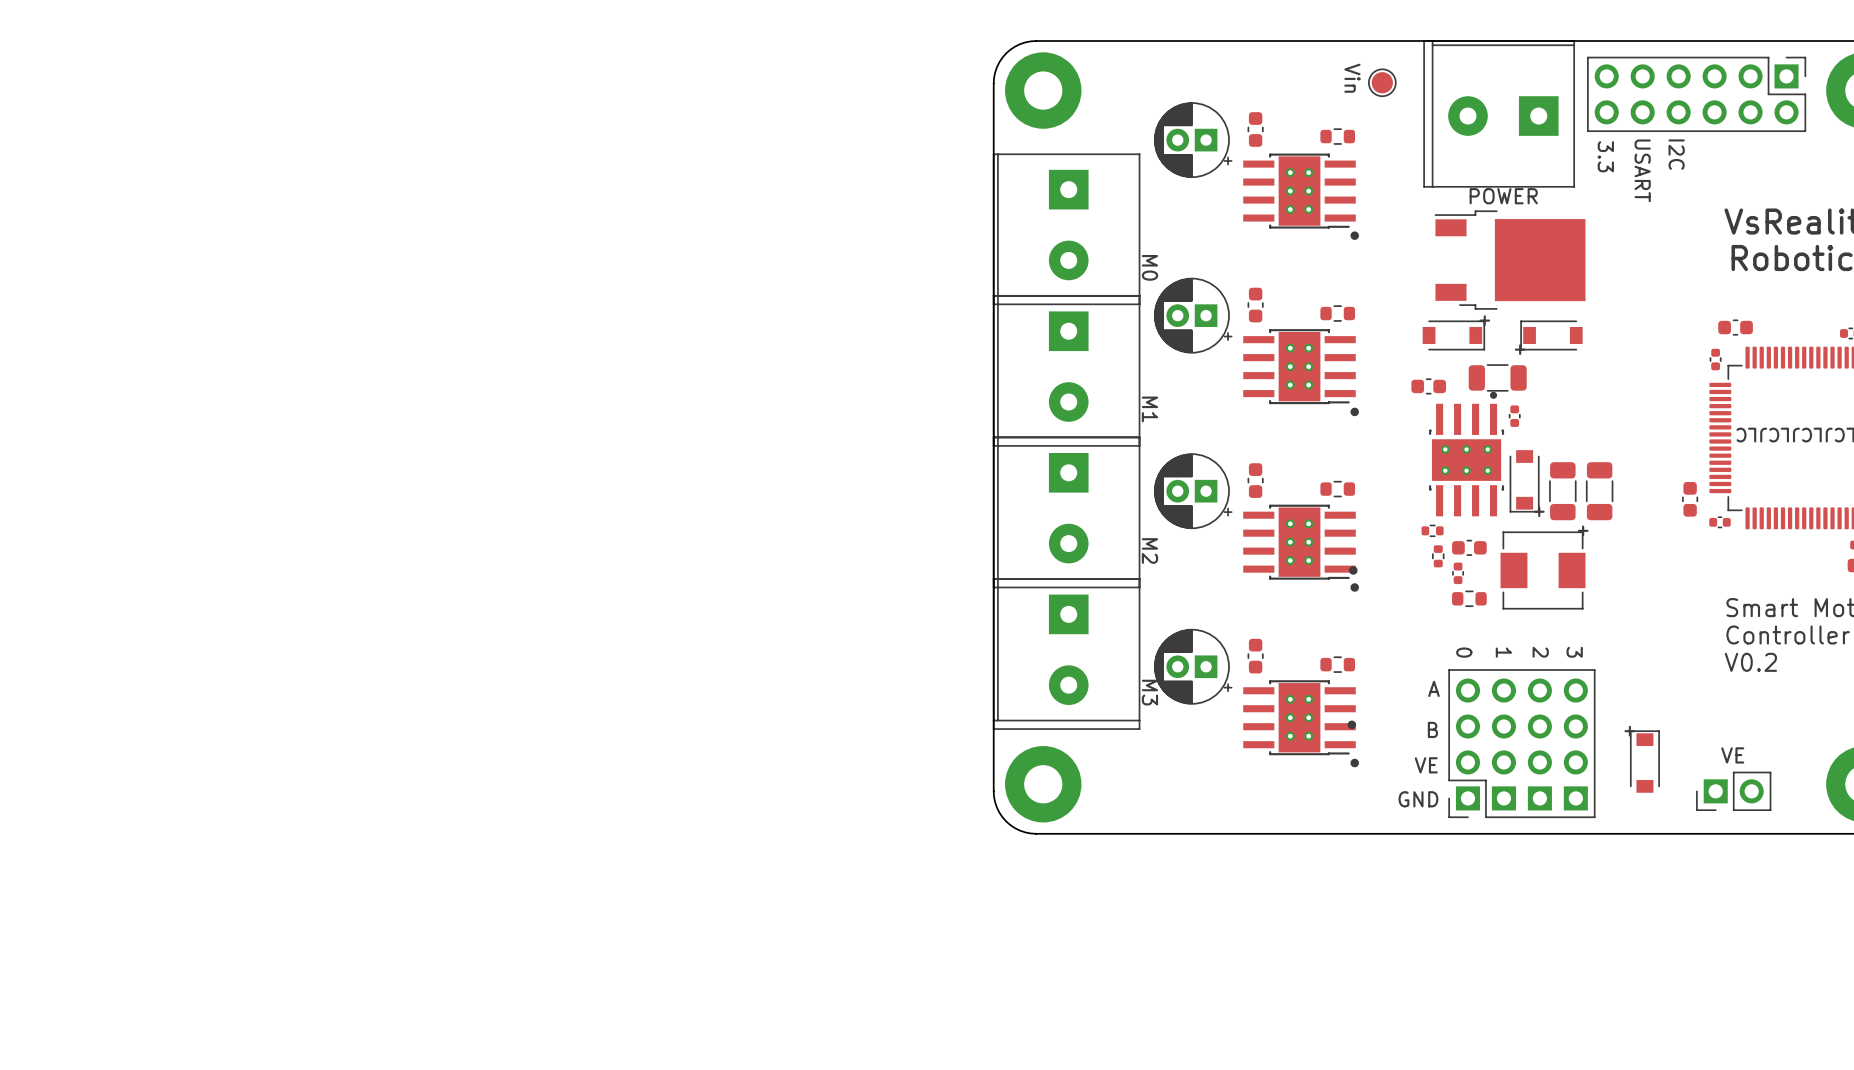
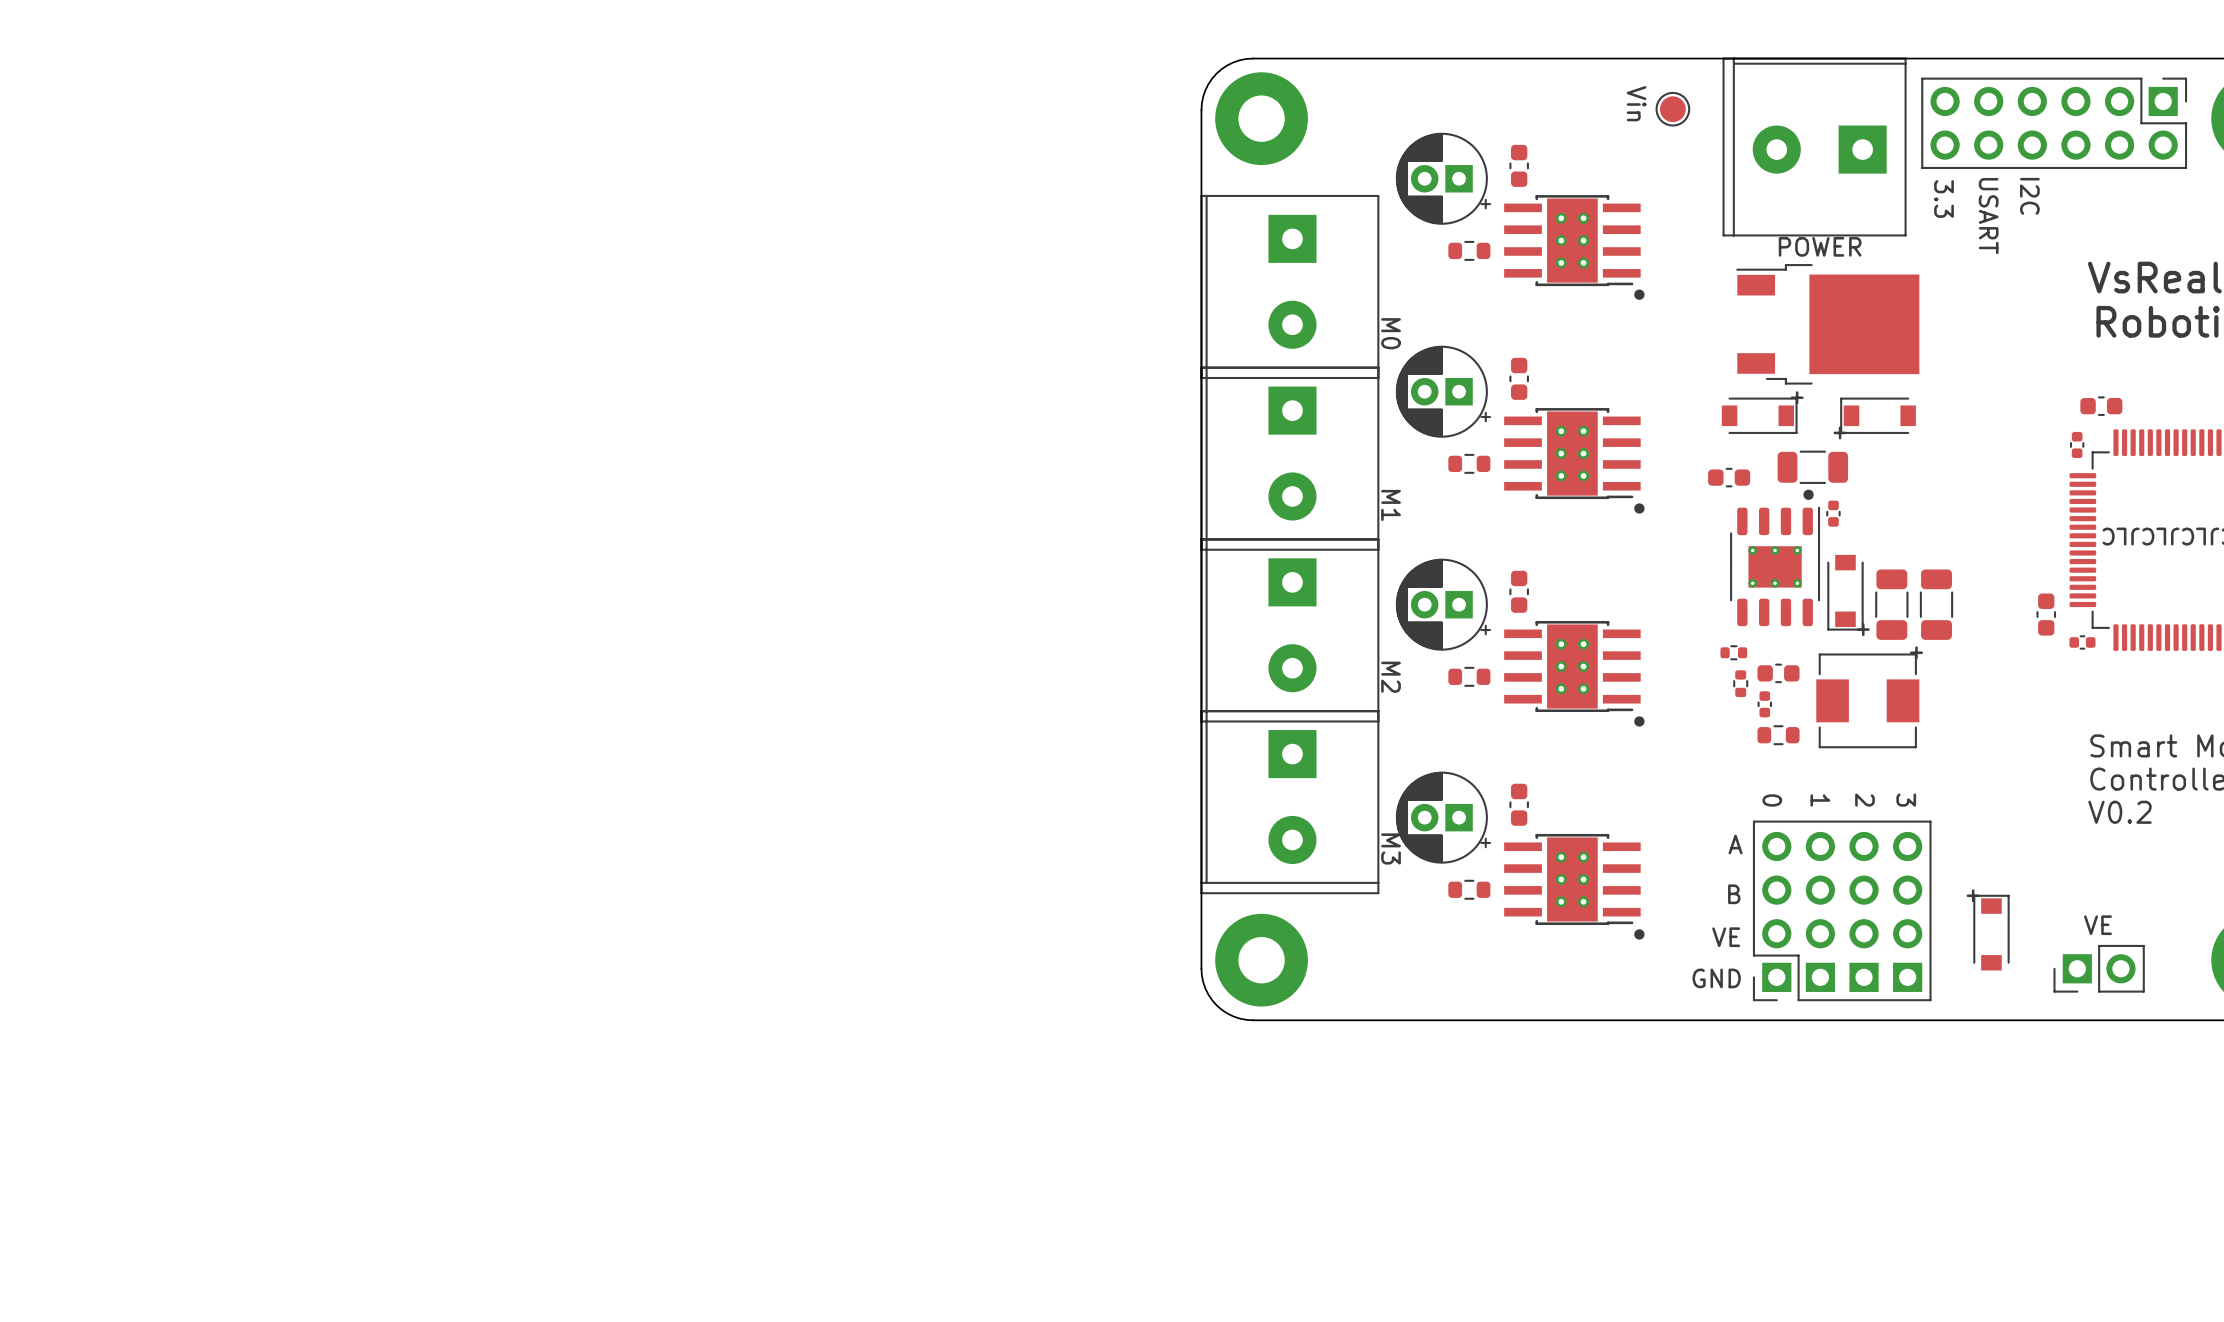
part: (1337, 136) -> none
part: none -> (1469, 250)
part: (1337, 313) -> none
part: none -> (1469, 463)
part footprint: [1429, 391, 1505, 517] -> [1730, 506, 1821, 627]
drawing: none -> [1803, 489, 1814, 500]
part: (1337, 489) -> none
part: none -> (1469, 676)
drawing: [1349, 566, 1358, 575] -> none
part: (1337, 664) -> none
drawing: [1347, 720, 1357, 730] -> none
part: none -> (1469, 889)

